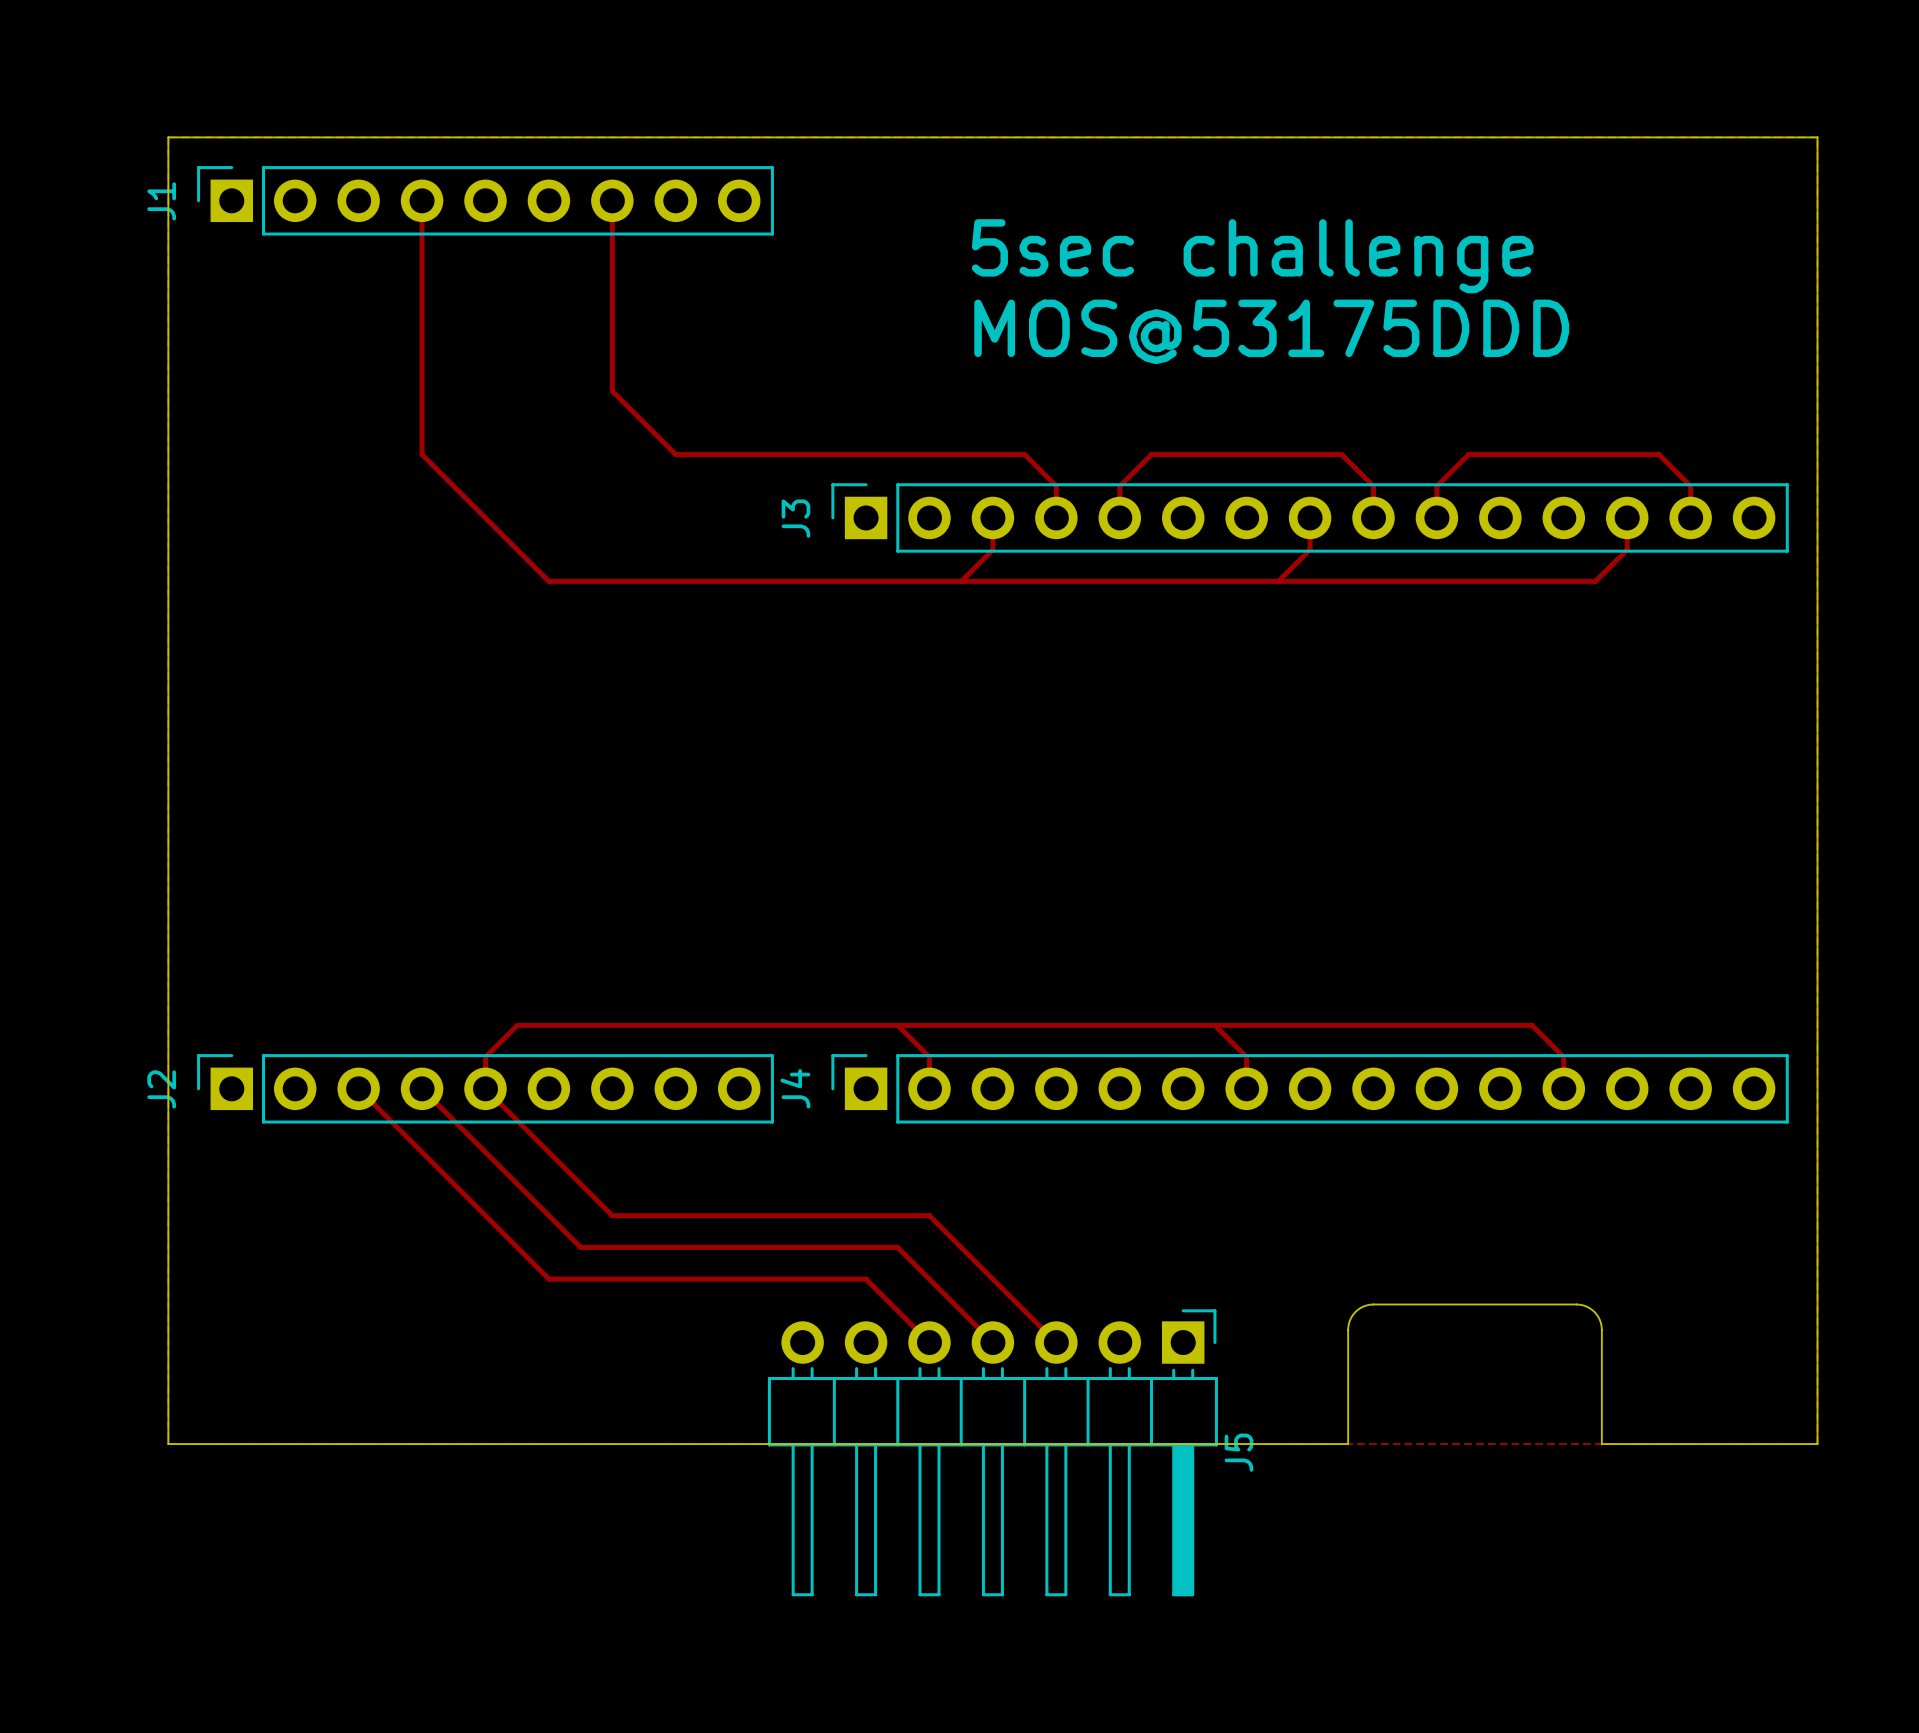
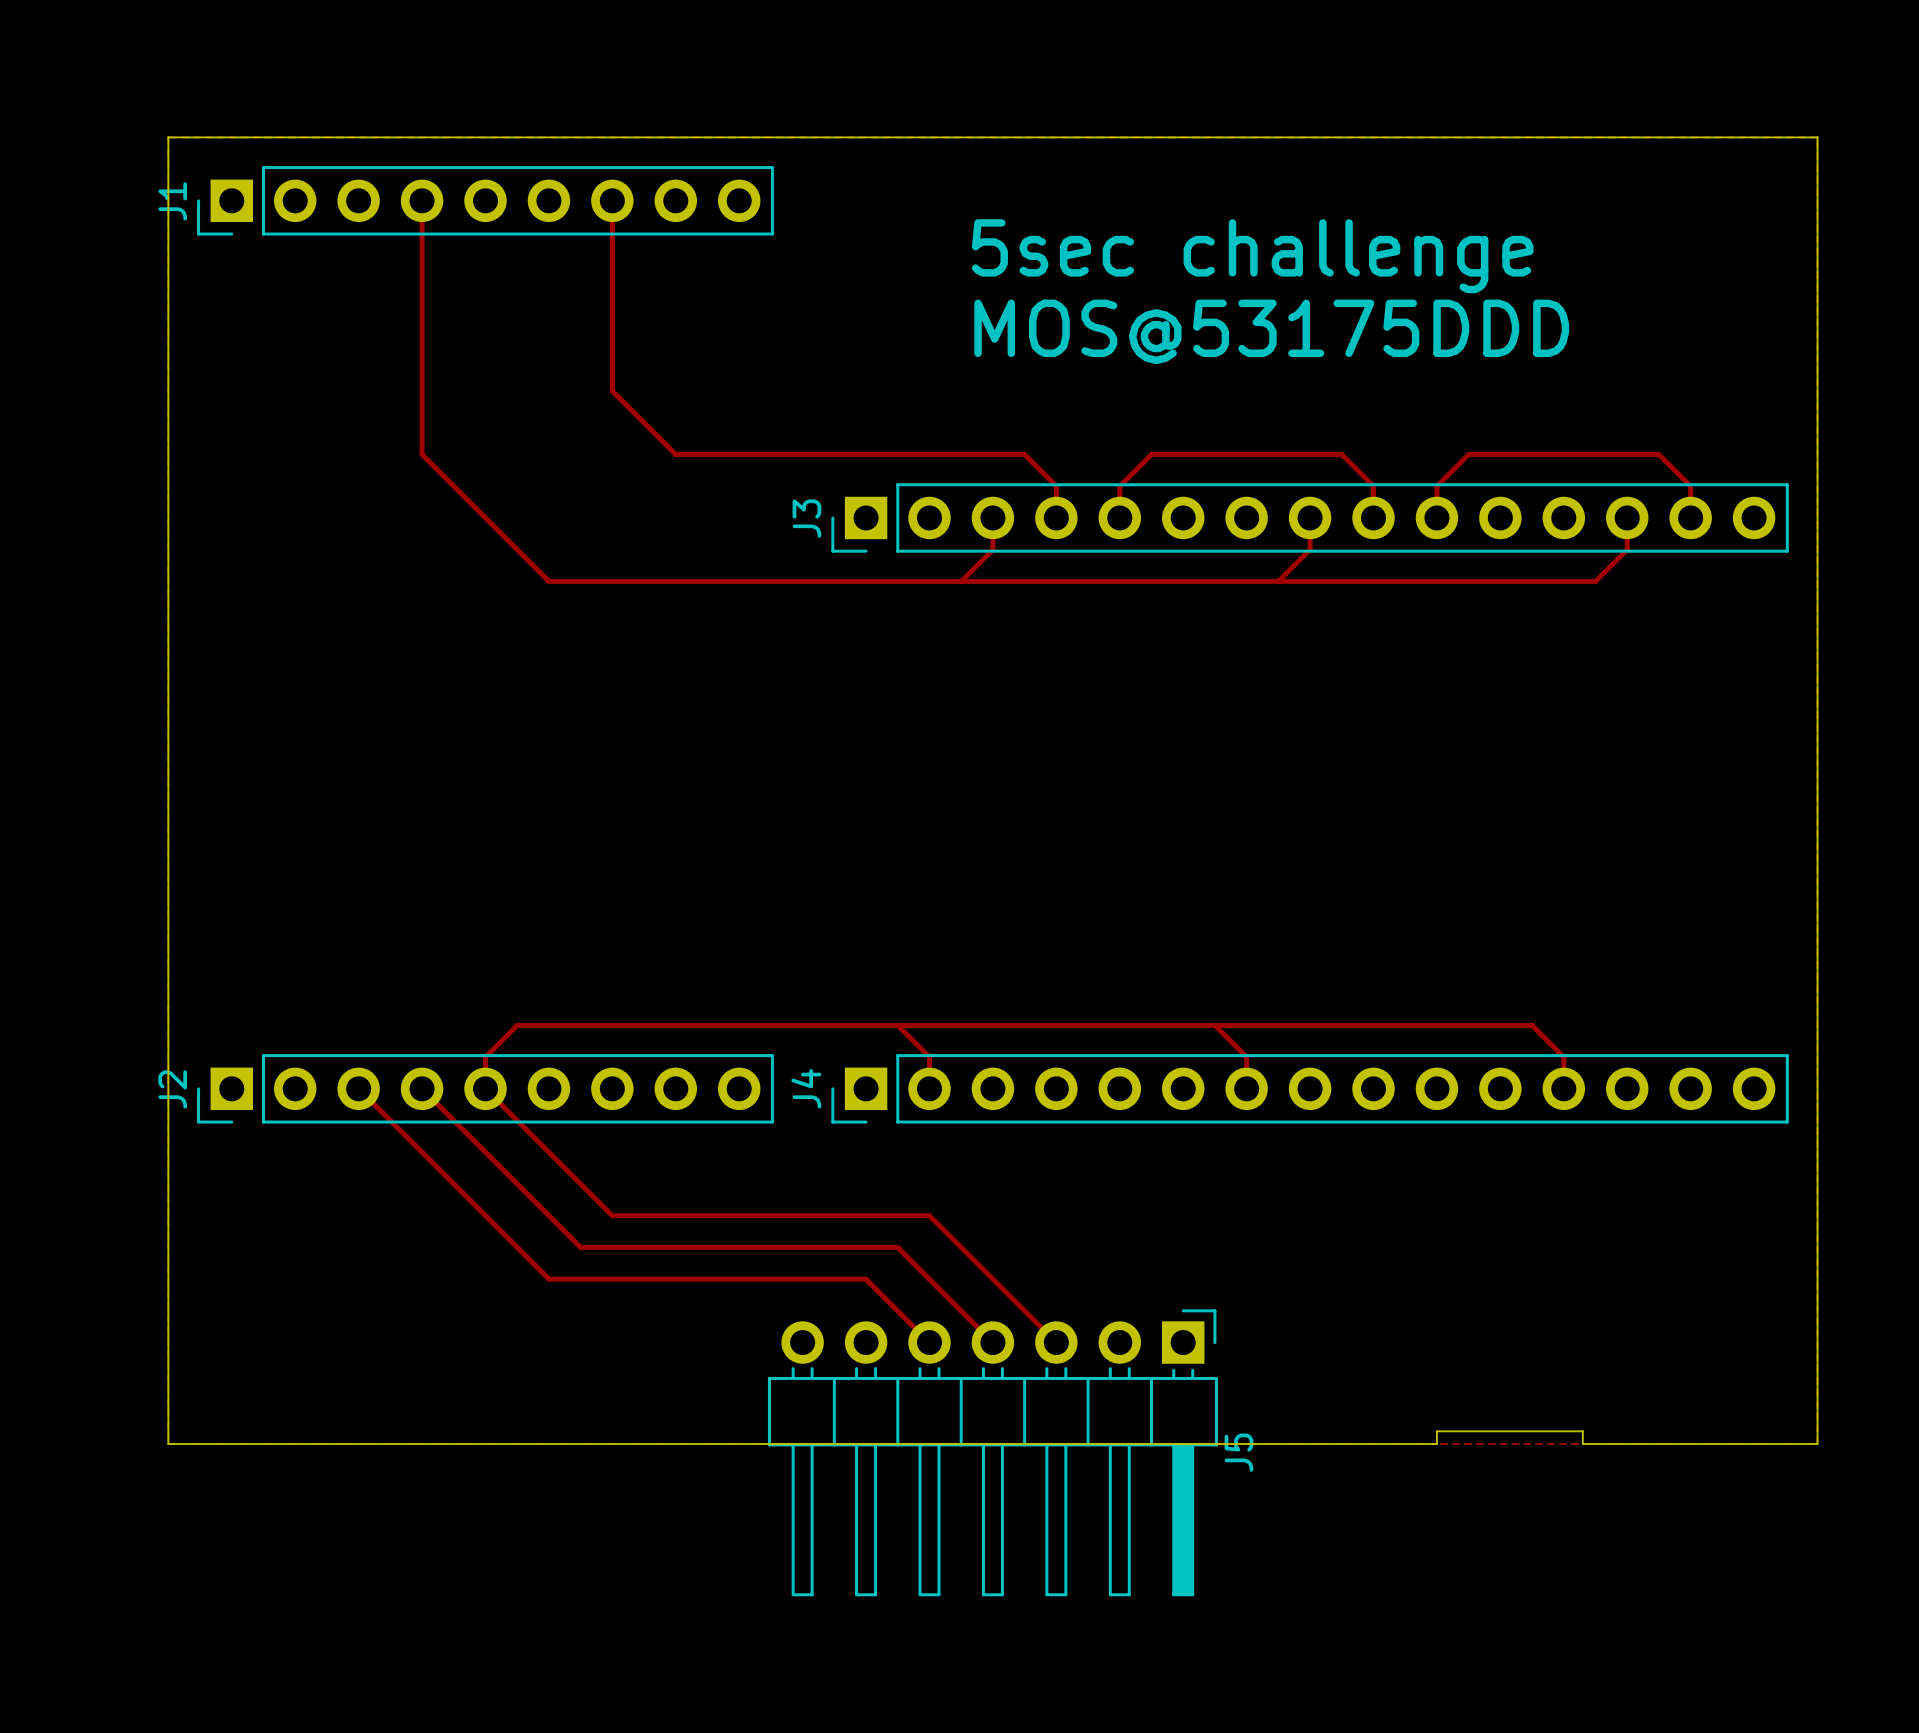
J1 footprint: [197, 166, 774, 236] -> [197, 166, 774, 236]
J3 footprint: [831, 483, 1789, 553] -> [831, 483, 1789, 553]
J2 footprint: [197, 1054, 774, 1124] -> [197, 1054, 774, 1124]
J4 footprint: [831, 1054, 1789, 1124] -> [831, 1054, 1789, 1124]
board edge: (1348, 1444) (1348, 1326) (1355, 1311) (1363, 1306) (1373, 1304) (1576, 1304) (1589, 1307) (1596, 1314) (1601, 1326) (1601, 1444) -> (1348, 1444) (1436, 1444) (1436, 1431) (1582, 1431) (1582, 1444) (1601, 1444)

